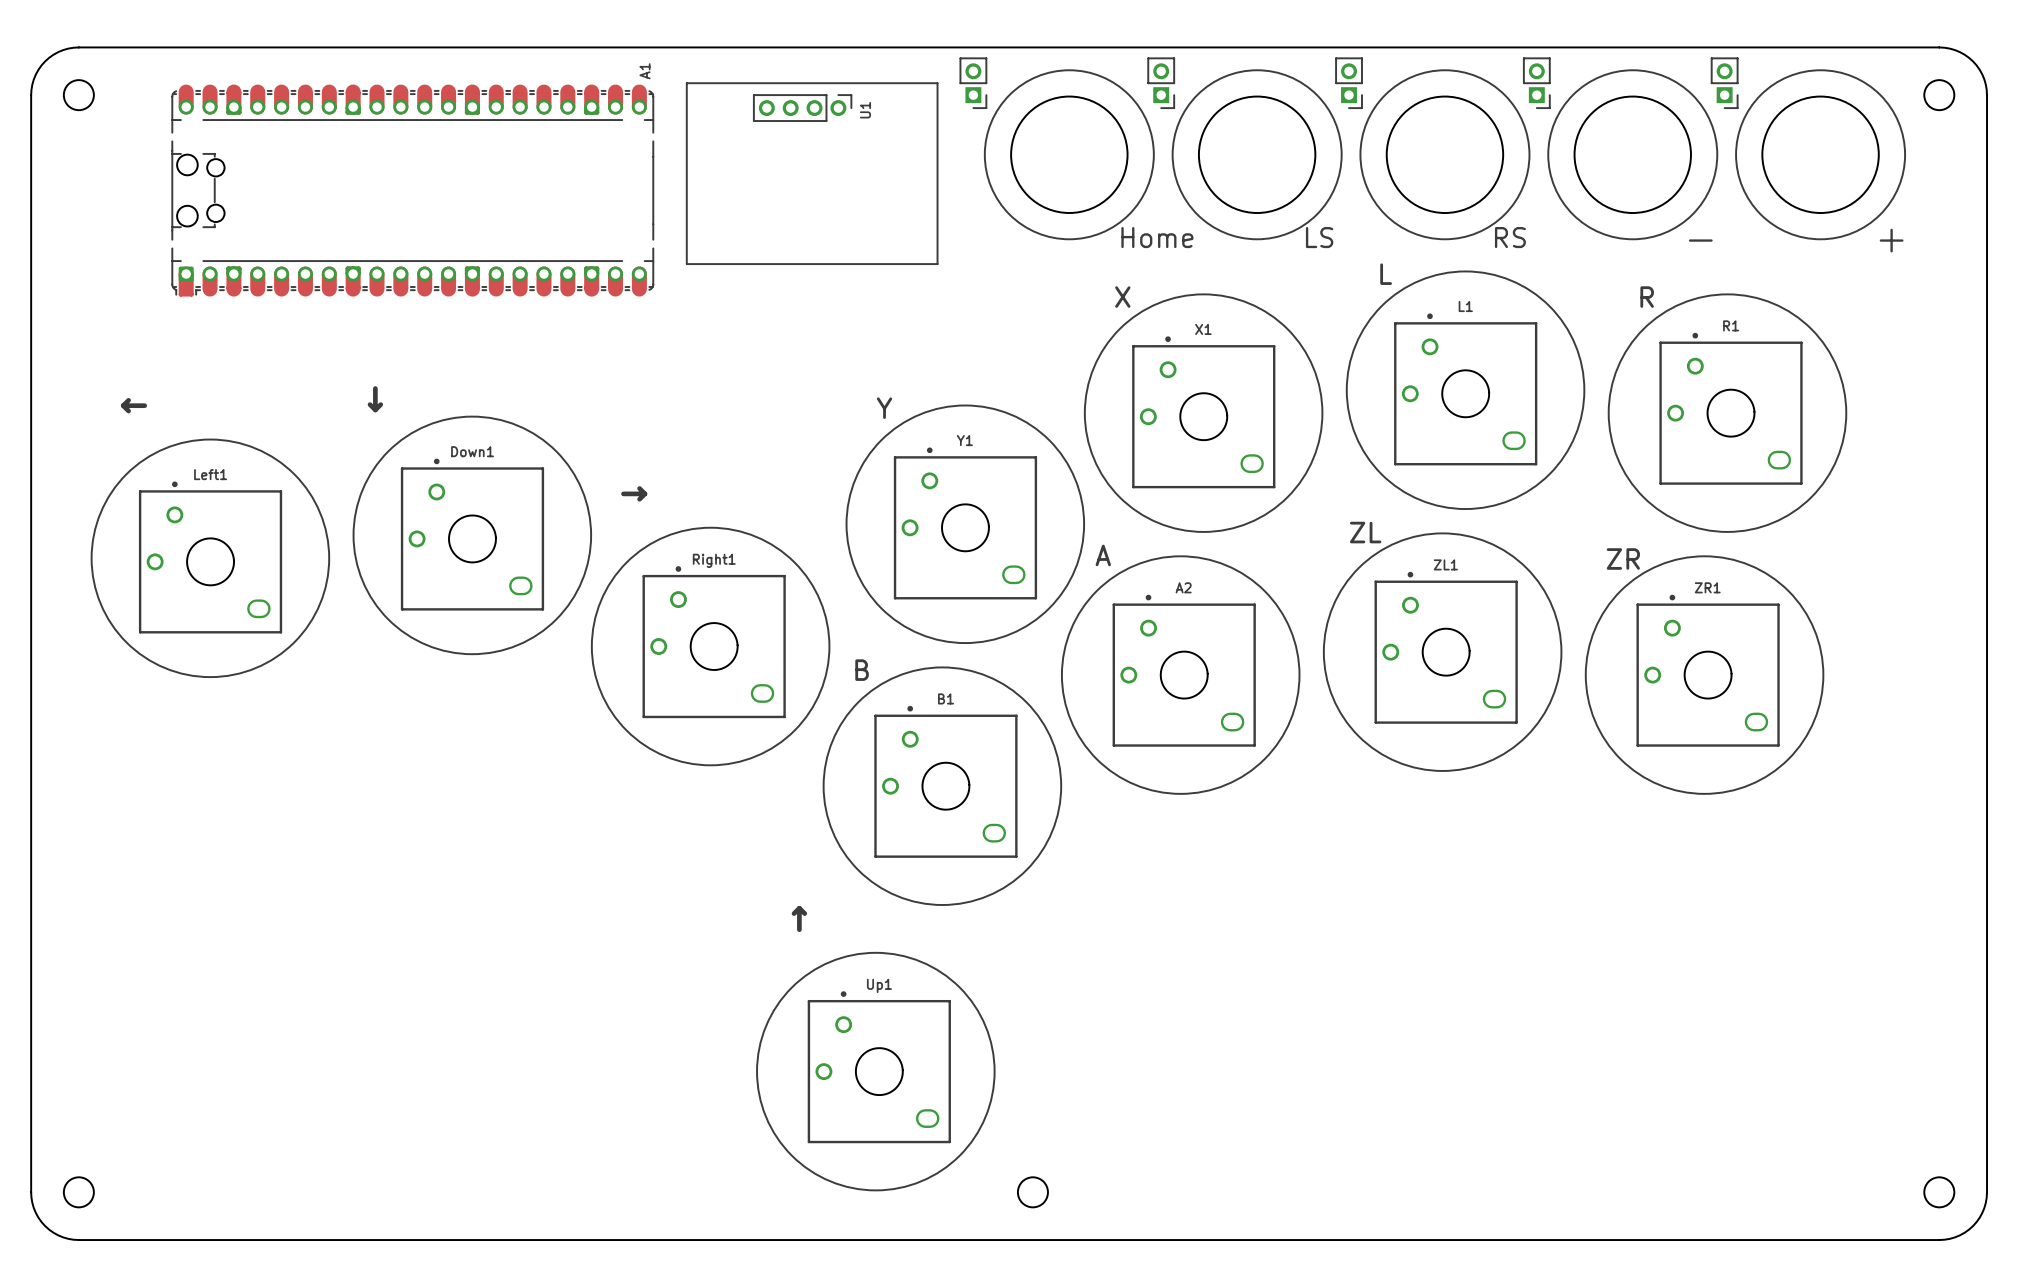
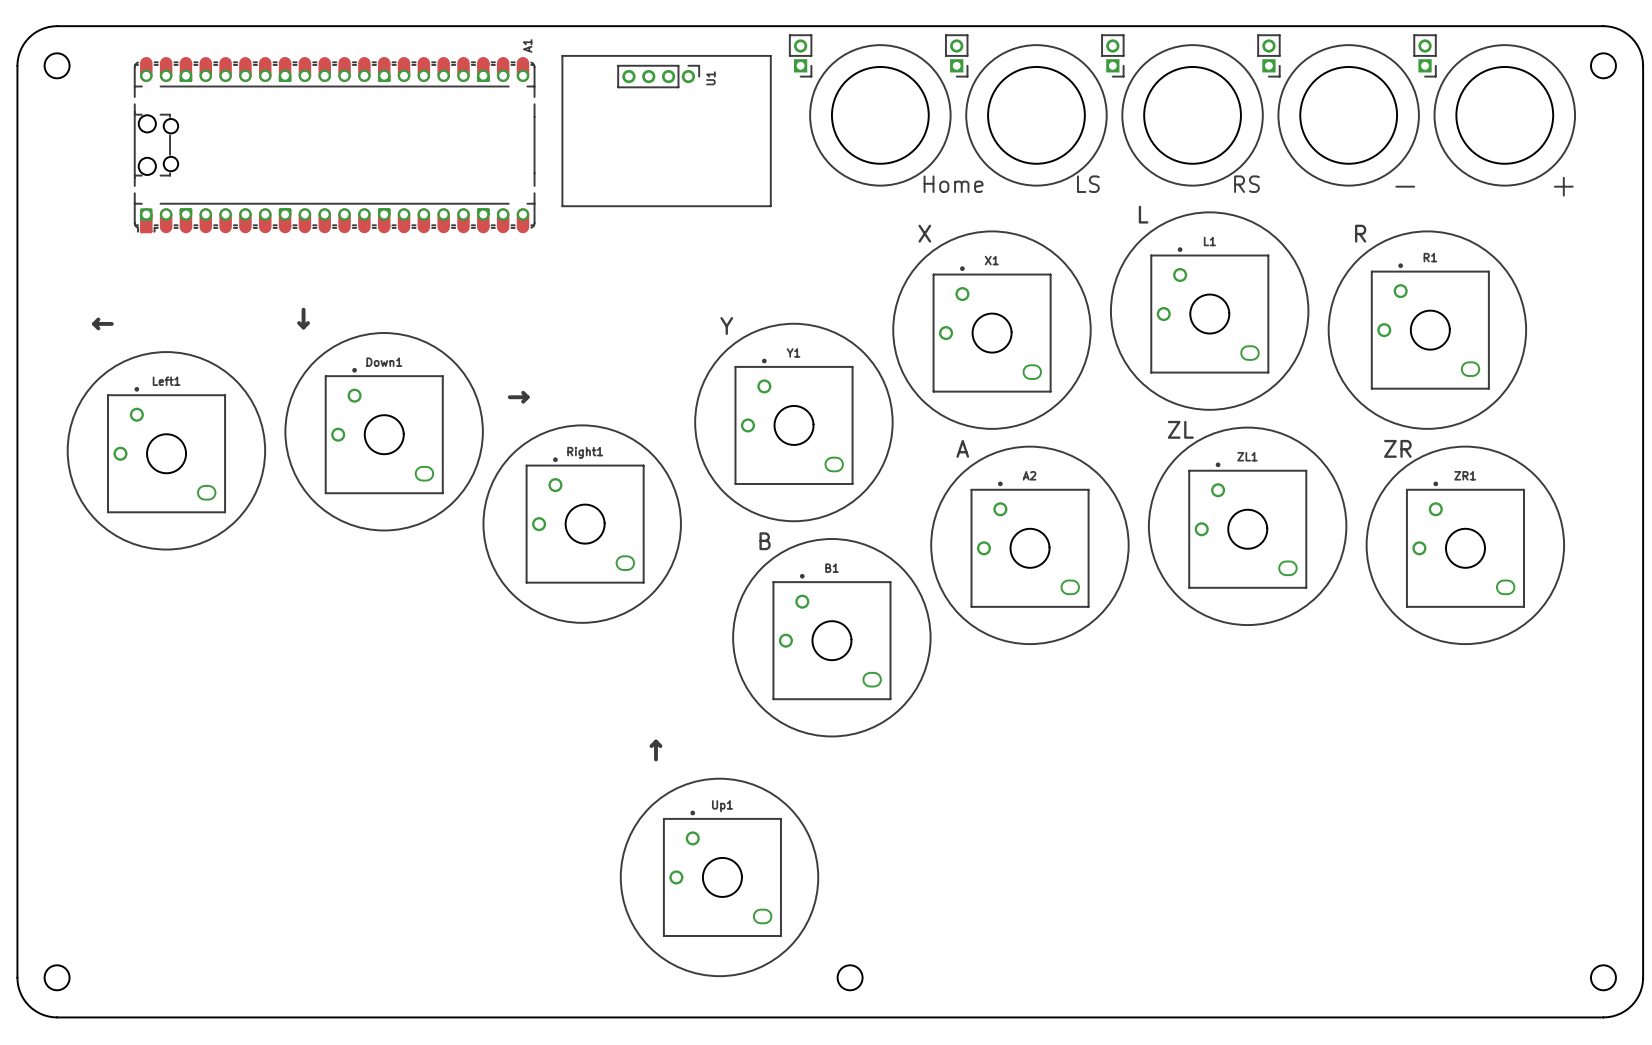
text position: ZL (1365, 532) -> ZL (1180, 429)
text position: A (1103, 555) -> A (962, 448)
text position: ZR (1623, 559) -> ZR (1397, 448)
ZL1 position: (1446, 647) -> (1247, 525)
drawing position: (1442, 652) -> (1247, 526)
text position: B (862, 670) -> B (765, 541)
A2 position: (1184, 670) -> (1030, 544)
ZR1 position: (1708, 670) -> (1465, 544)
drawing position: (1180, 675) -> (1029, 545)
drawing position: (1704, 675) -> (1465, 545)
B1 position: (945, 781) -> (831, 637)
drawing position: (942, 786) -> (831, 637)

